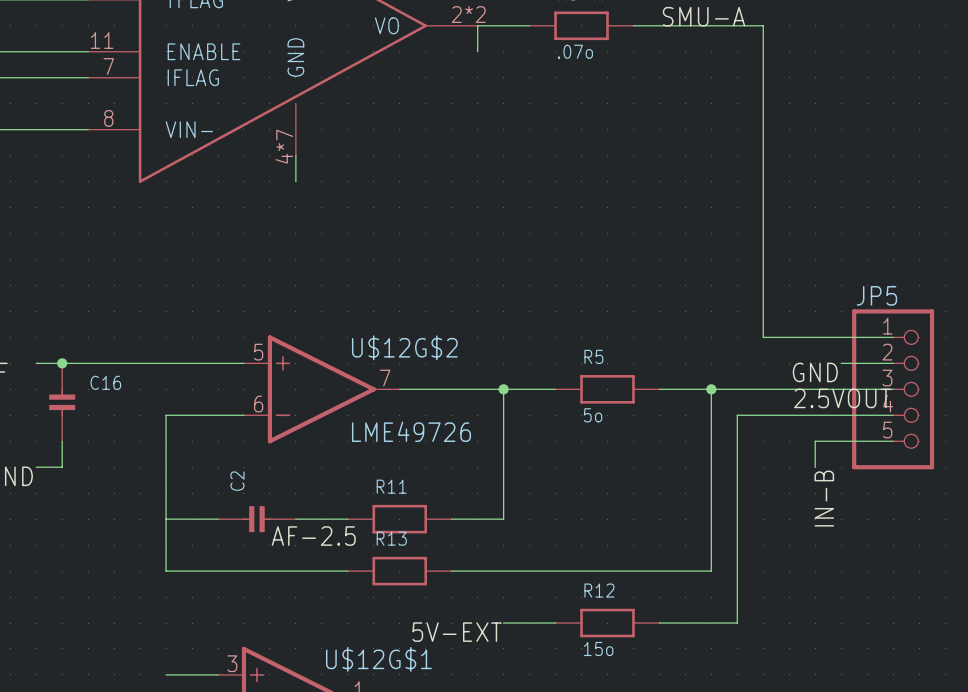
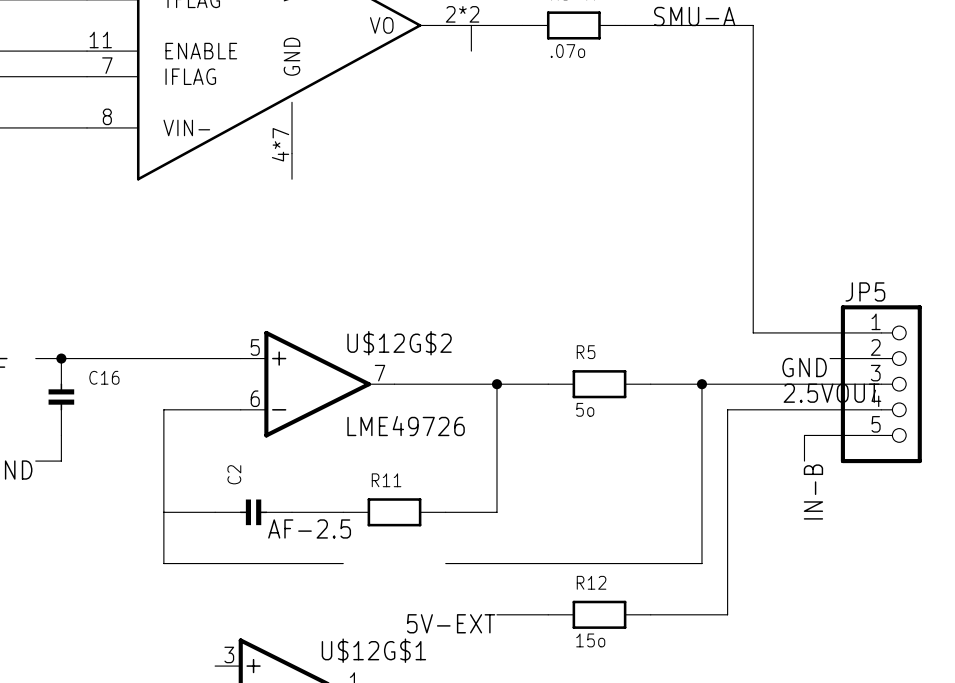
R13: (399, 571) -> none
wire: (166, 674) (218, 674) -> none

